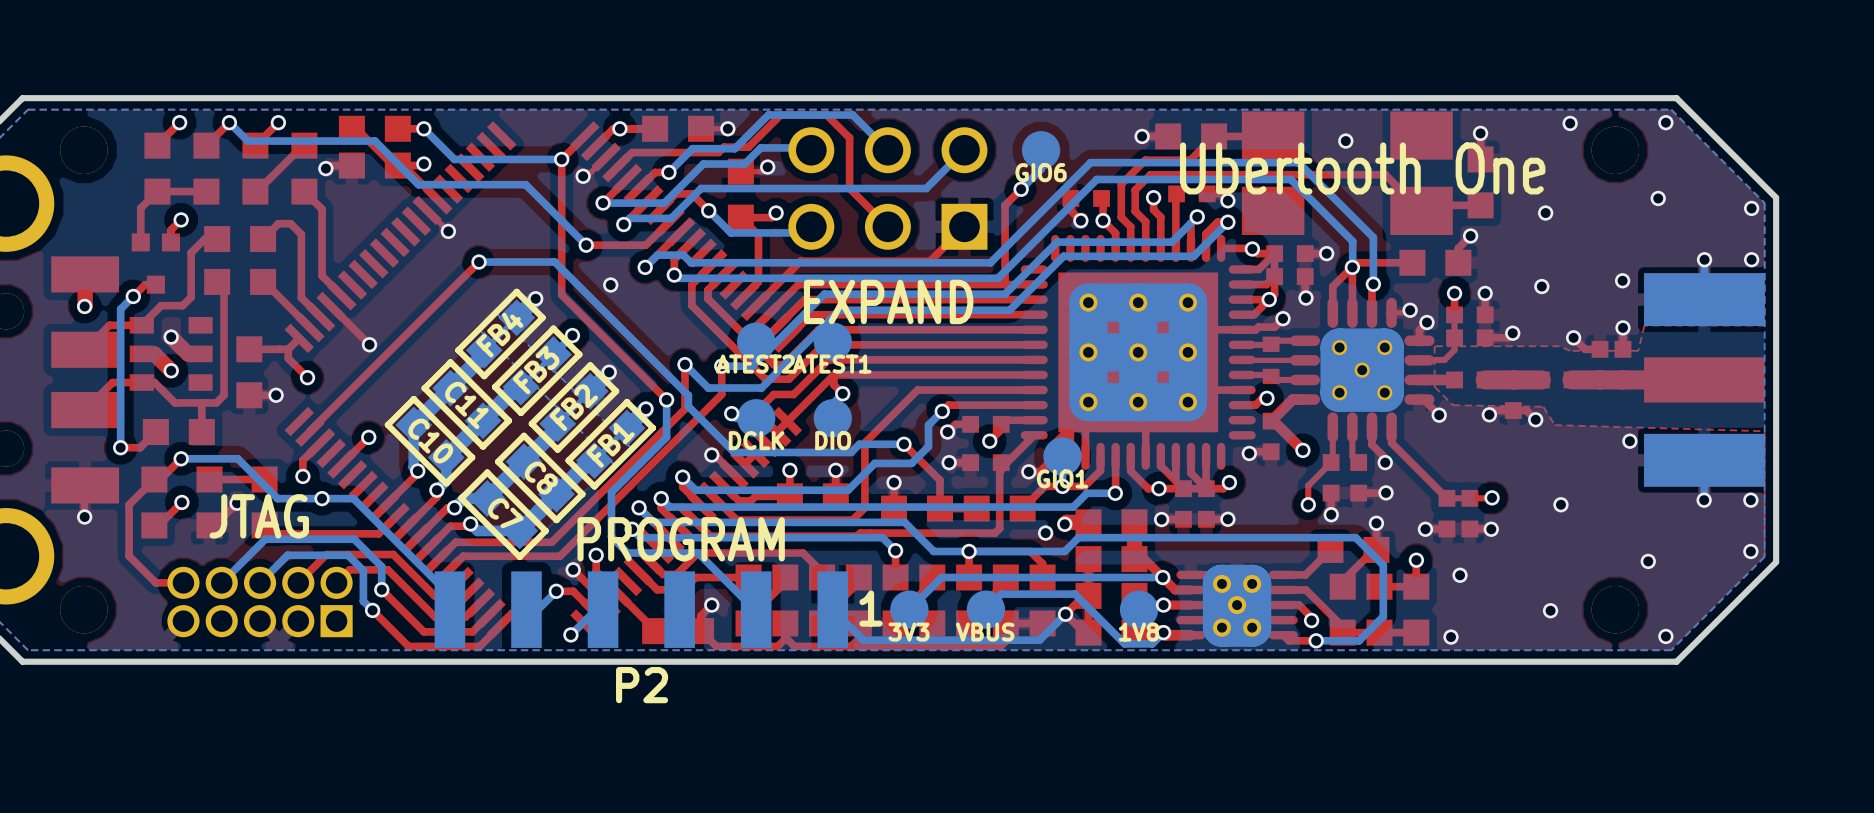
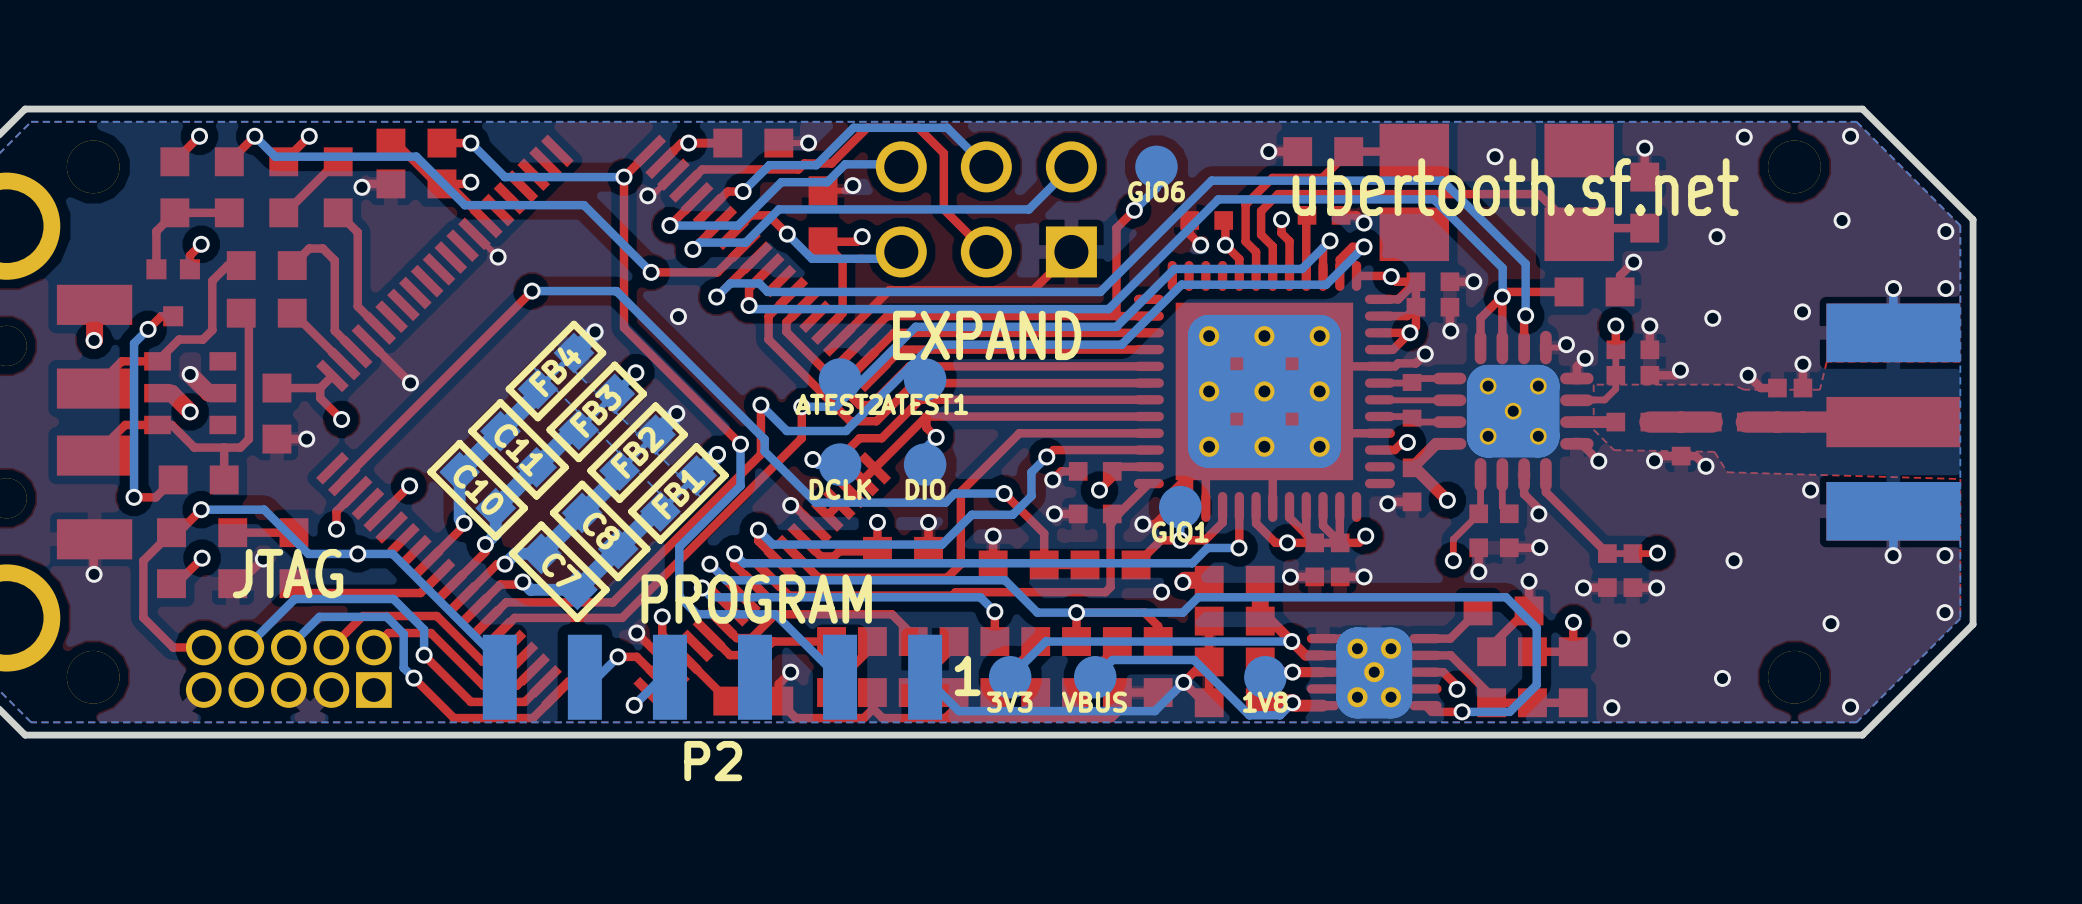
text: Ubertooth One (1362, 168) -> ubertooth.sf.net (1515, 187)

